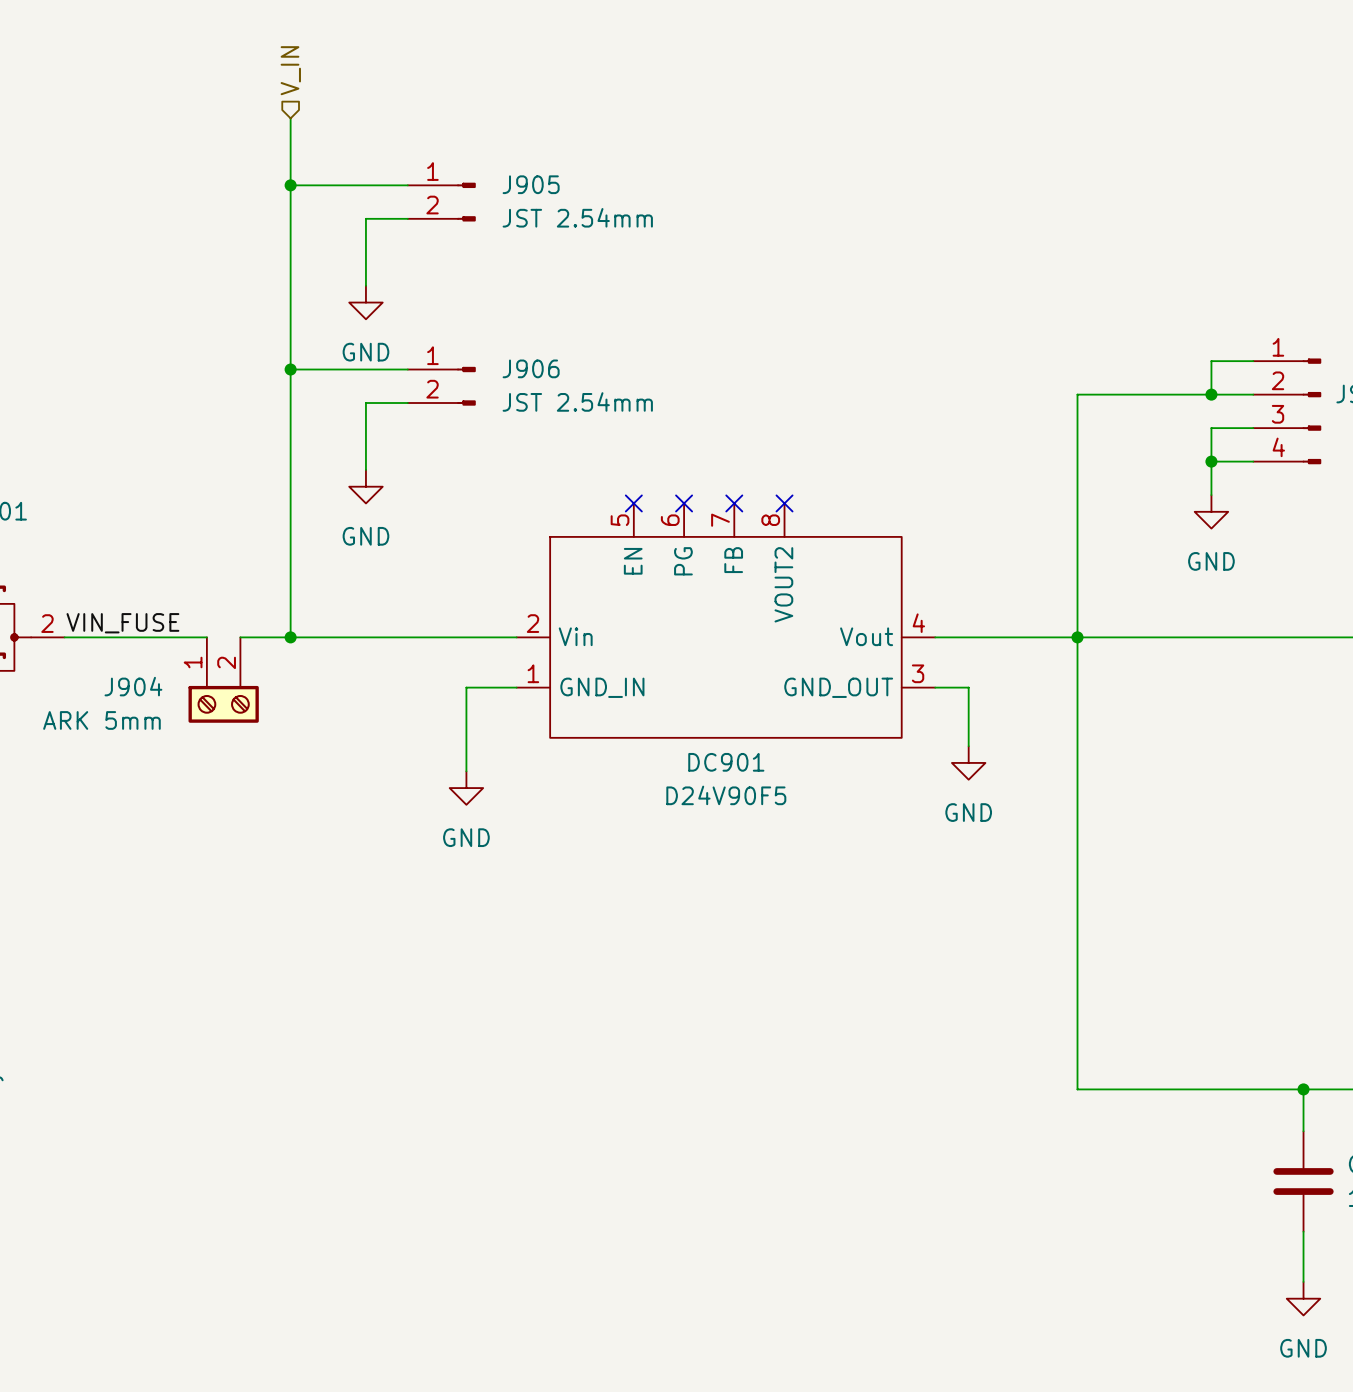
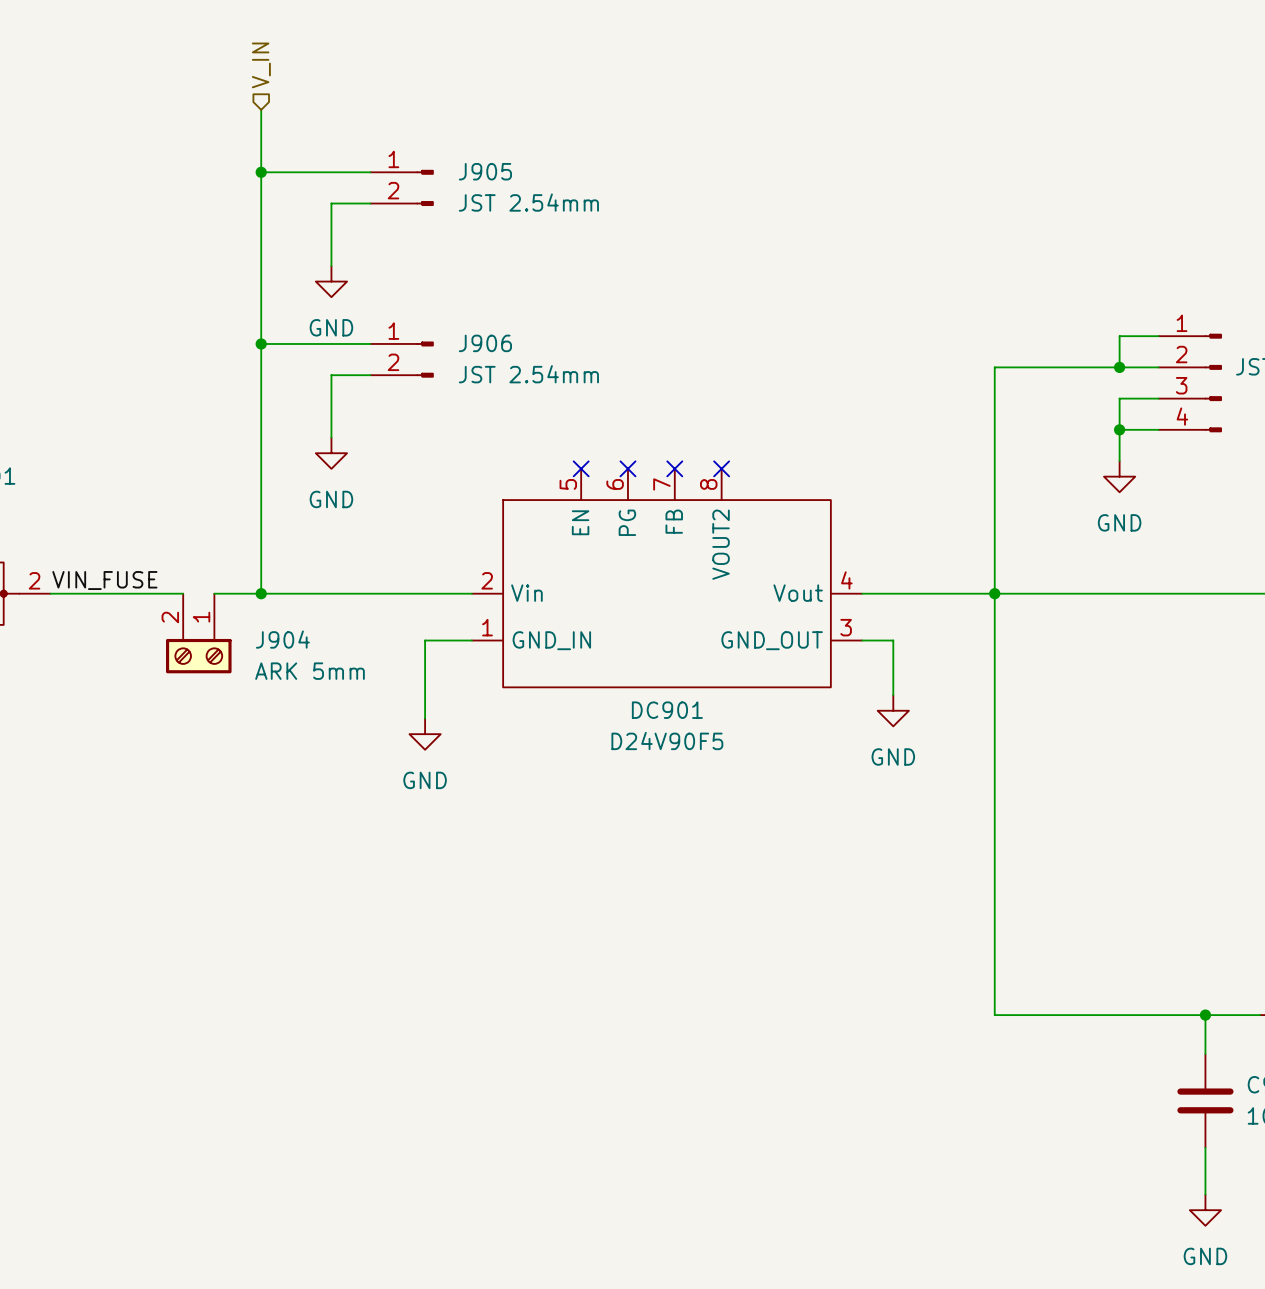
J904 flip: as is (223, 704) -> left-right (198, 656)

